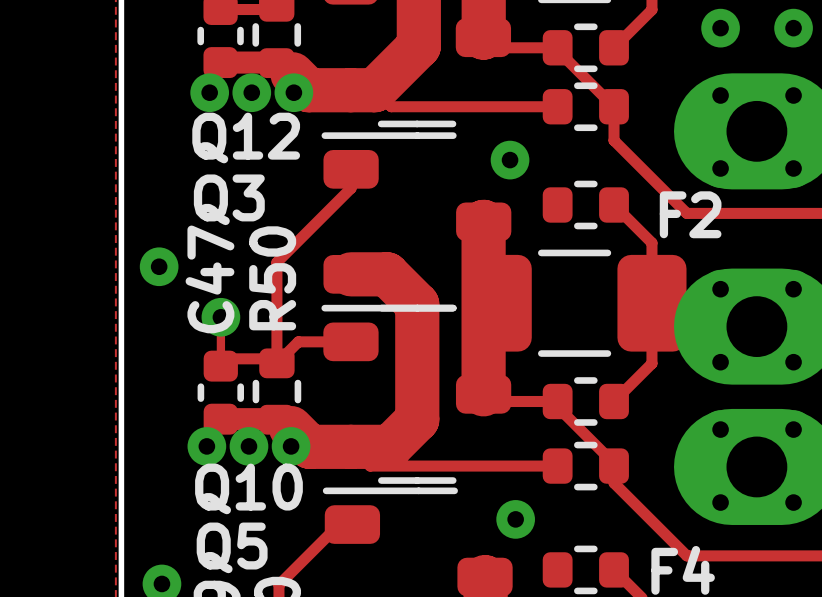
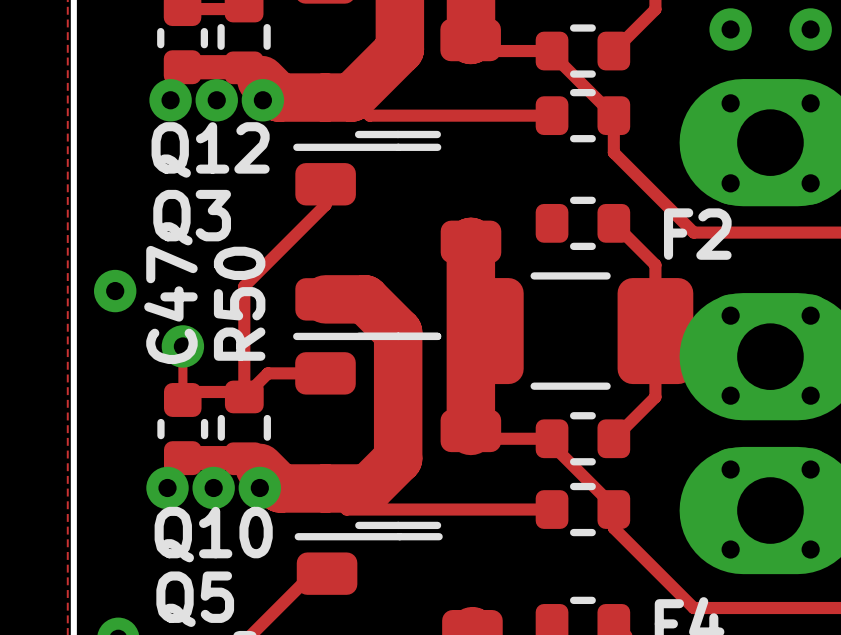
via: (510, 160) -> none
via: (515, 519) -> none

